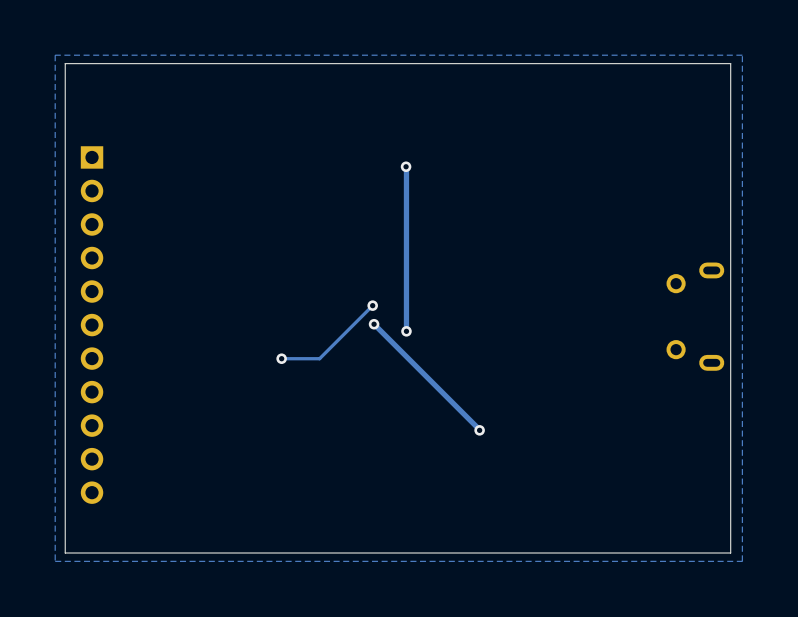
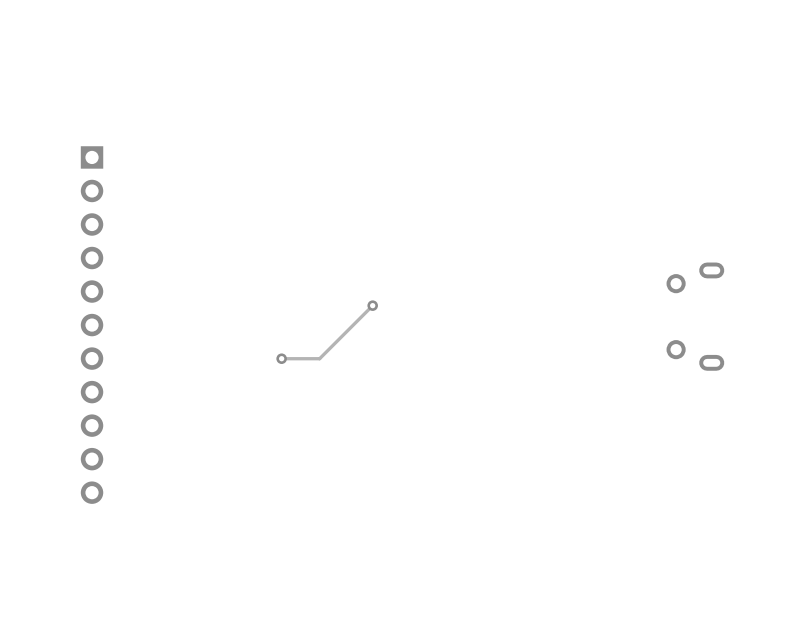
zone outline: (742, 55) (742, 561) (55, 561) (55, 55) (742, 55) -> none
board edge: (730, 63) (65, 63) (65, 553) (730, 553) (730, 63) -> none
track: (406, 166) (406, 331) -> none
via: (406, 166) -> none
track: (374, 324) (479, 430) -> none
via: (374, 324) -> none
via: (406, 331) -> none
via: (479, 430) -> none

